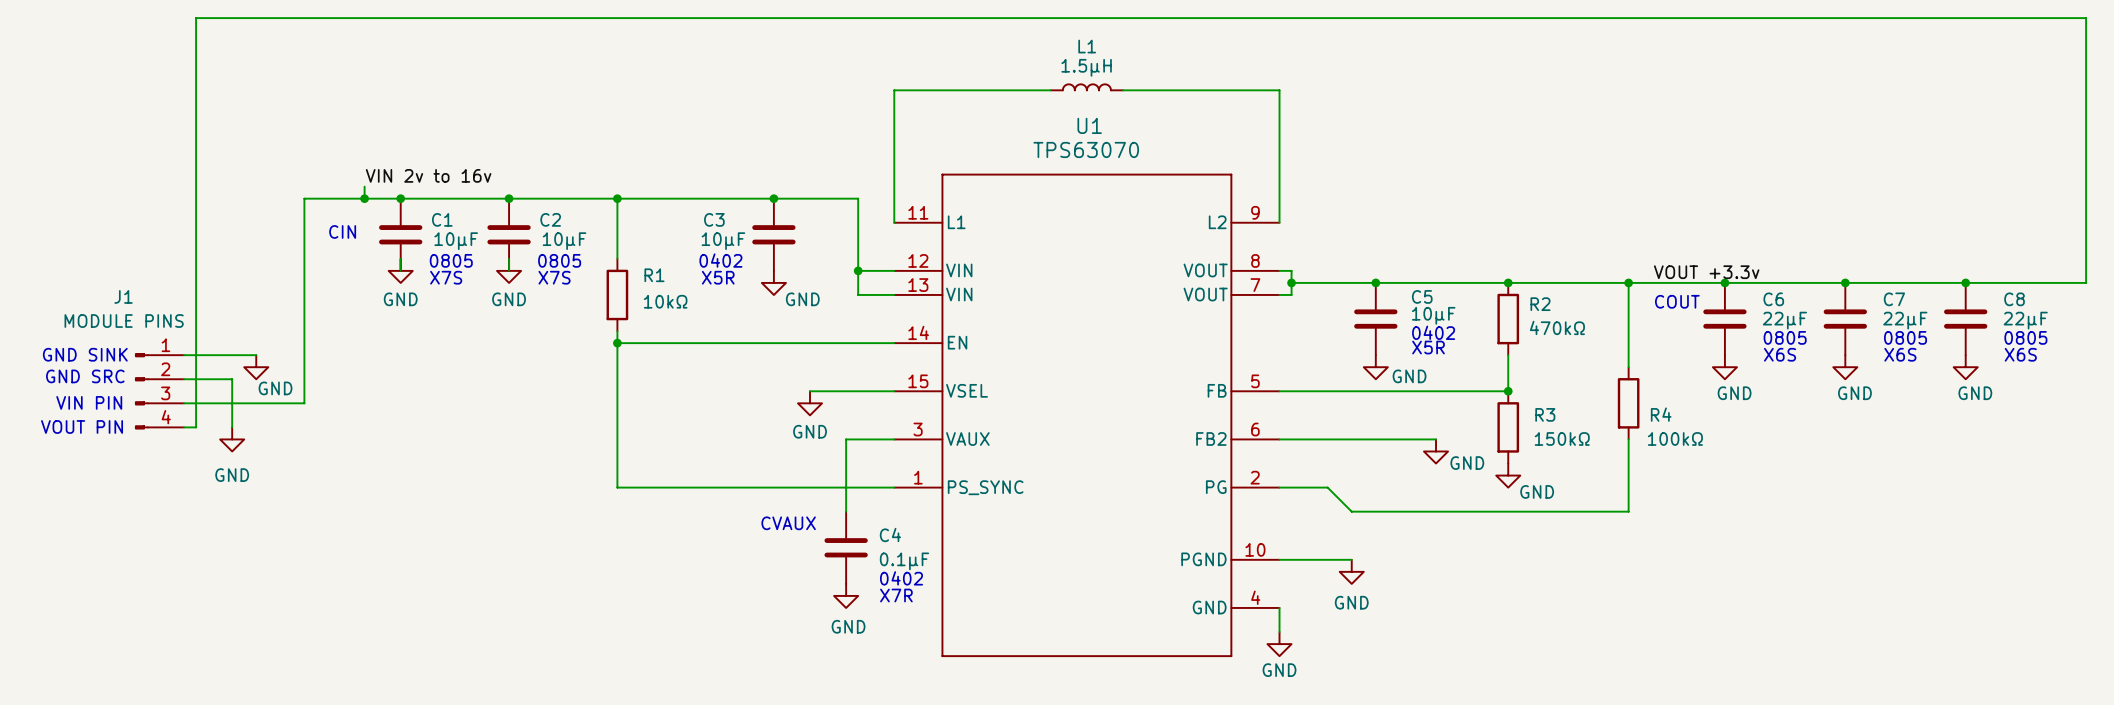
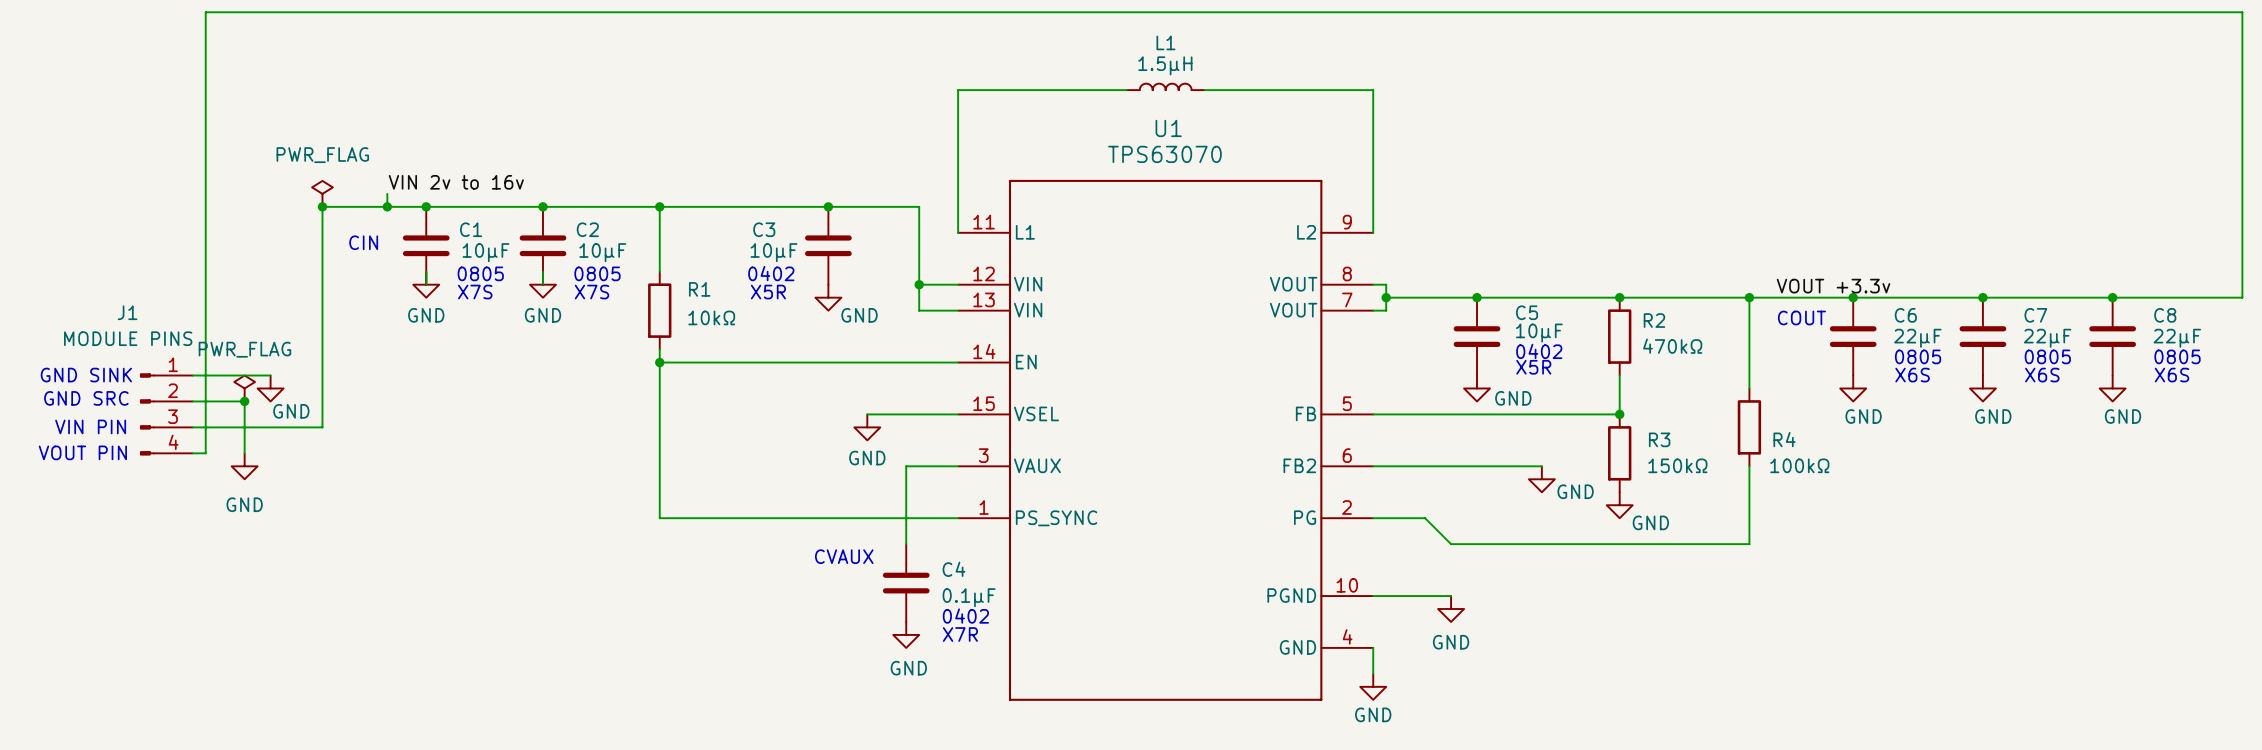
power symbol: none -> PWR_FLAG (322, 193)
junction: none -> (322, 206)
power symbol: none -> PWR_FLAG (244, 388)
junction: none -> (244, 401)

